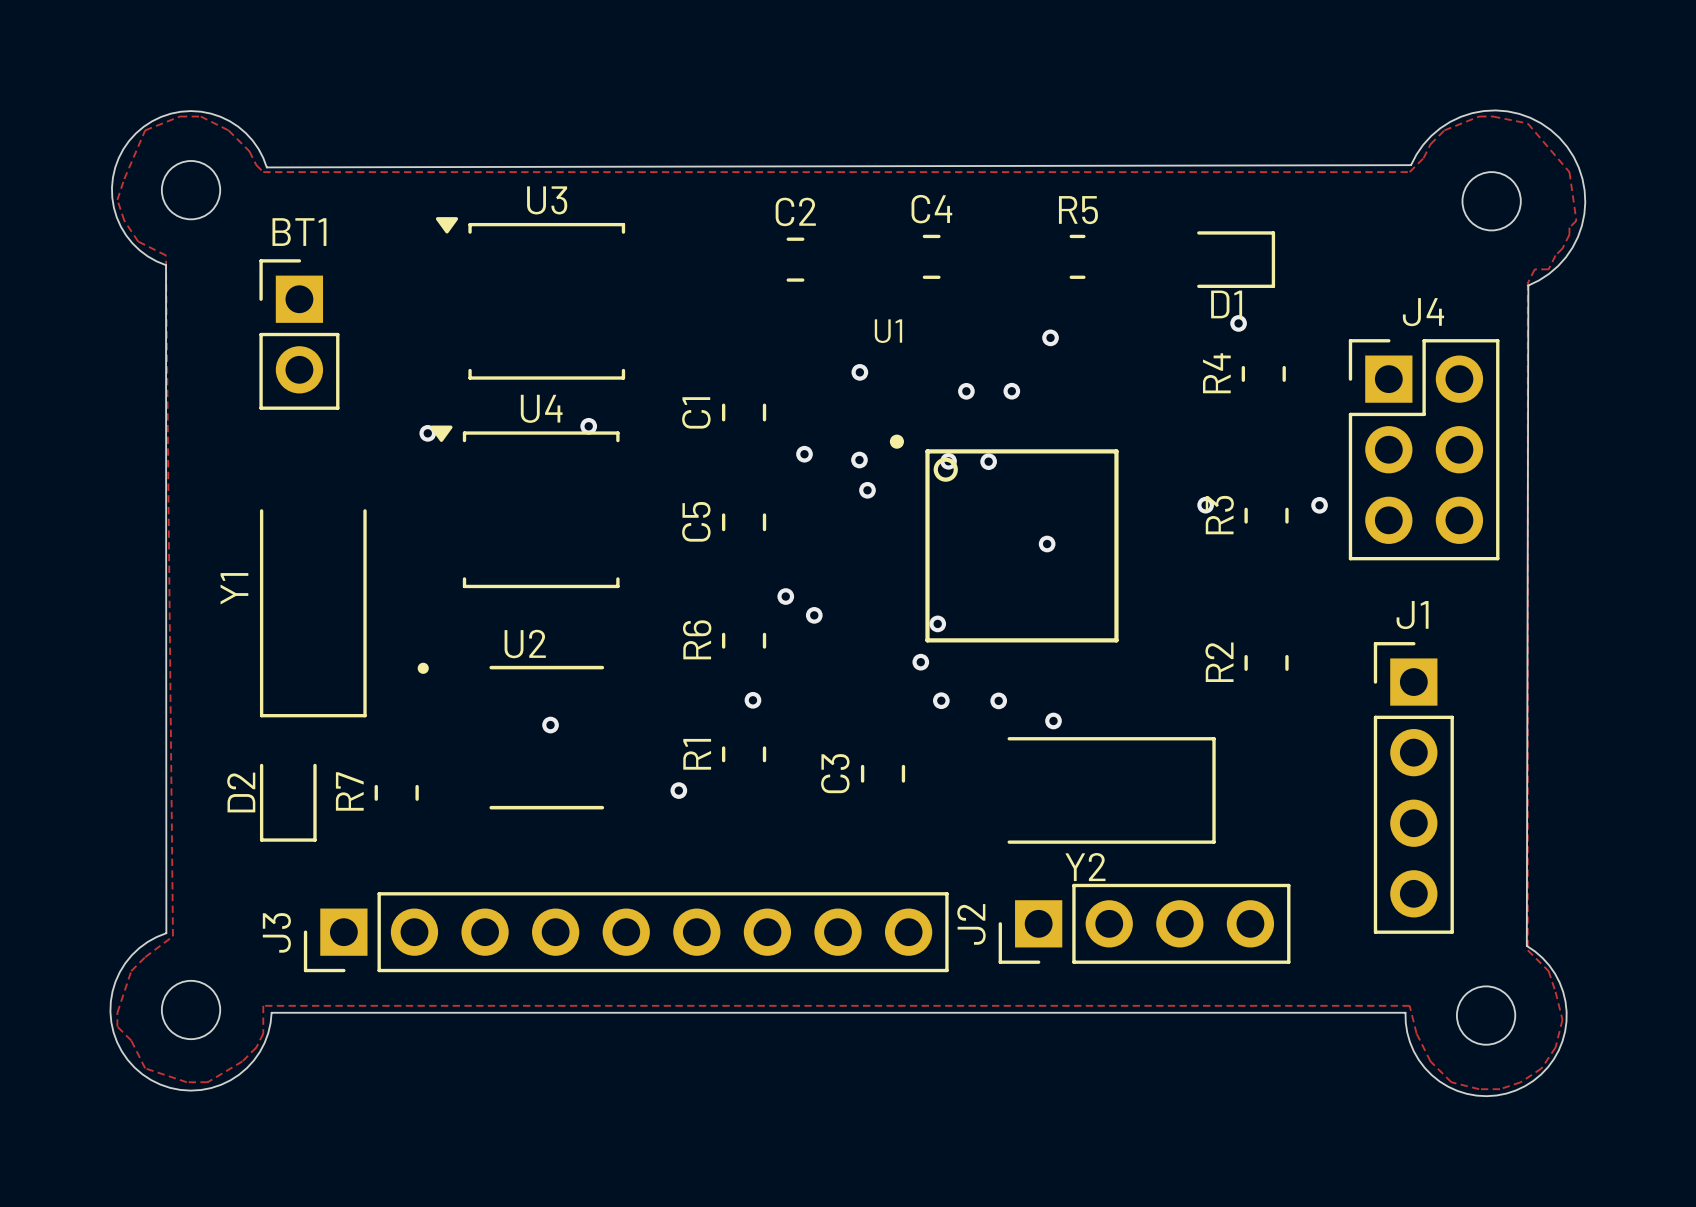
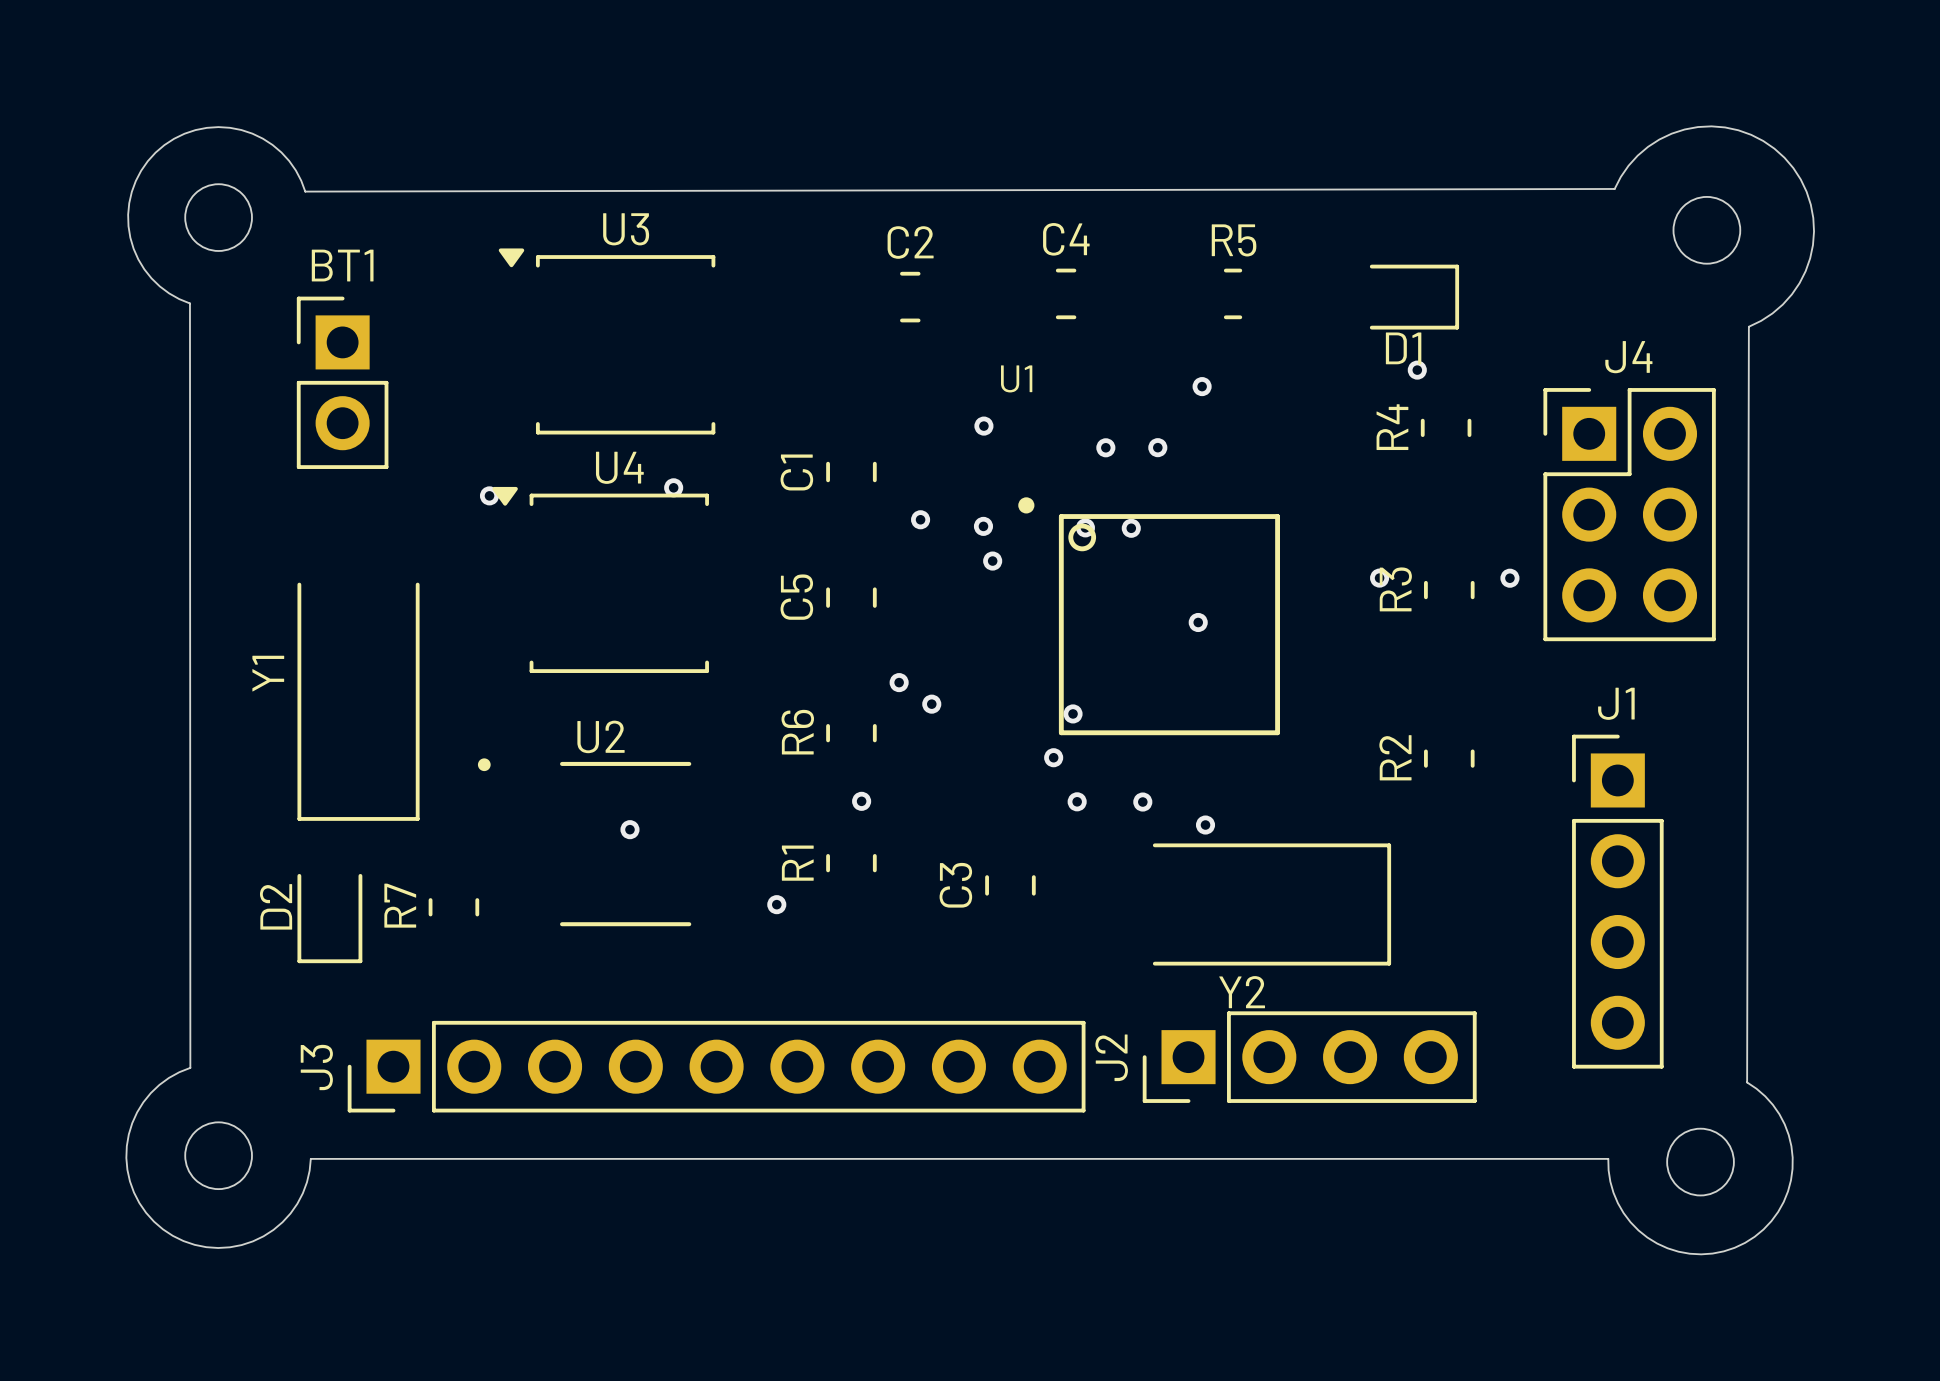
zone outline: (179, 116) (200, 116) (228, 130) (249, 151) (256, 165) (263, 172) (1409, 172) (1423, 158) (1430, 144) (1444, 130) (1479, 116) (1493, 116) (1527, 123) (1569, 172) (1576, 220) (1569, 227) (1569, 234) (1548, 269) (1534, 269) (1527, 283) (1527, 950) (1548, 971) (1562, 1019) (1555, 1047) (1541, 1068) (1520, 1082) (1499, 1089) (1479, 1089) (1451, 1082) (1430, 1061) (1416, 1033) (1409, 1005) (263, 1005) (263, 1033) (256, 1047) (242, 1061) (207, 1082) (186, 1082) (145, 1068) (131, 1040) (117, 1026) (117, 1012) (131, 971) (145, 957) (172, 936) (166, 255) (138, 241) (124, 220) (117, 199) (145, 130) (179, 116) -> none

